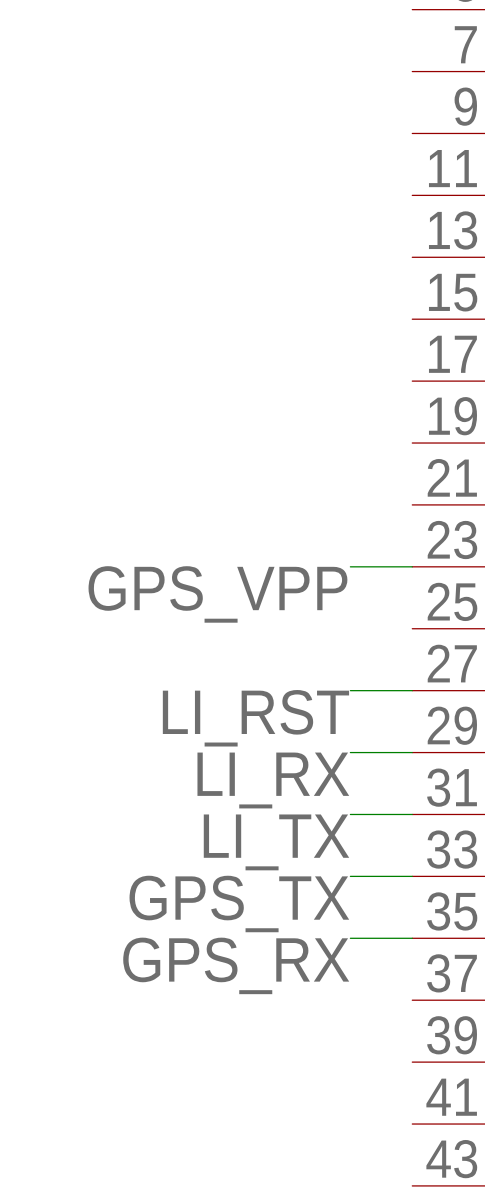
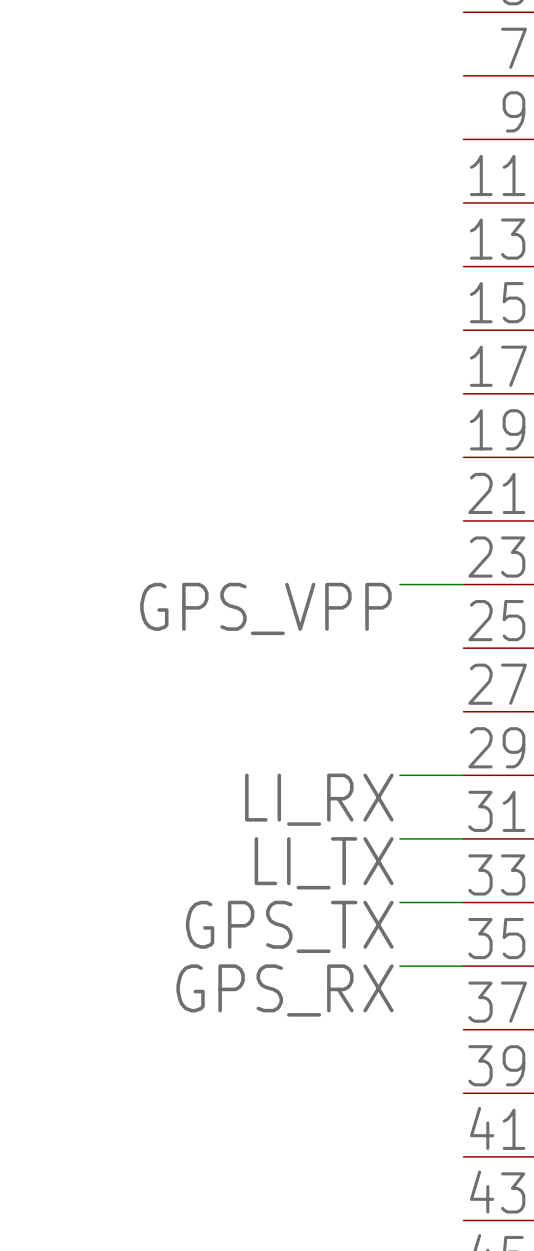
wire: (350, 690) (412, 690) -> none
label: LI_RST (255, 718) -> none

